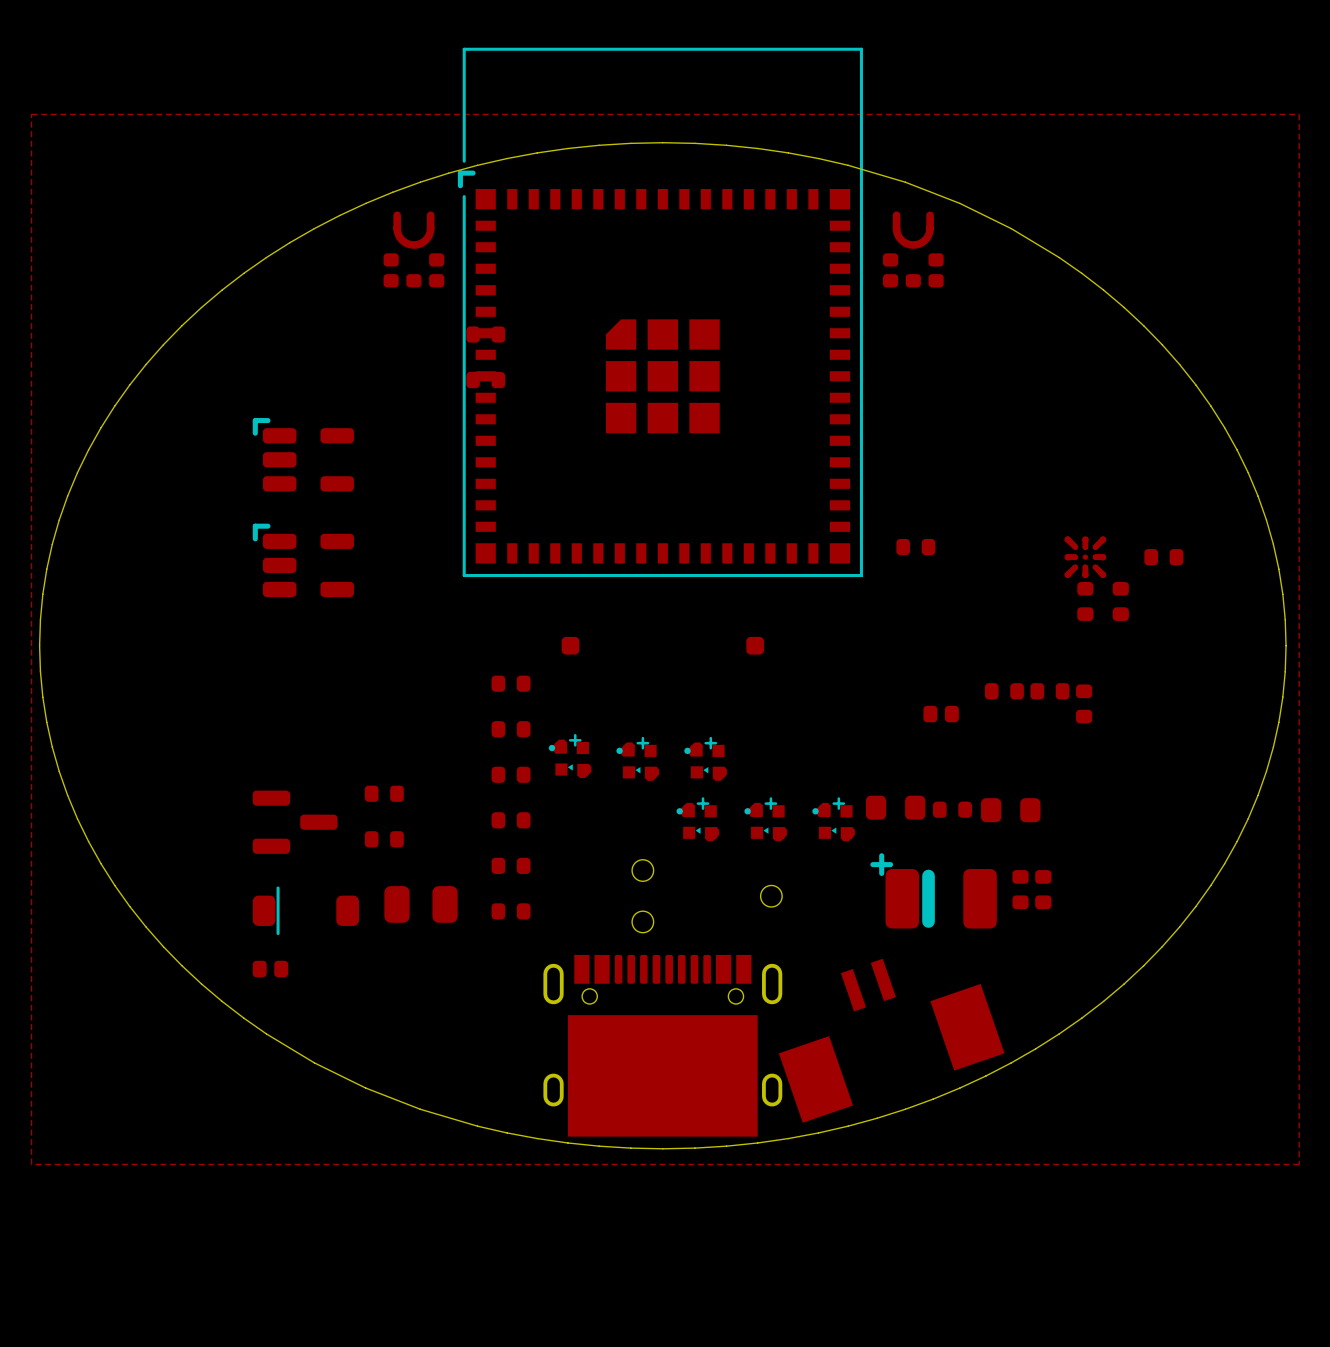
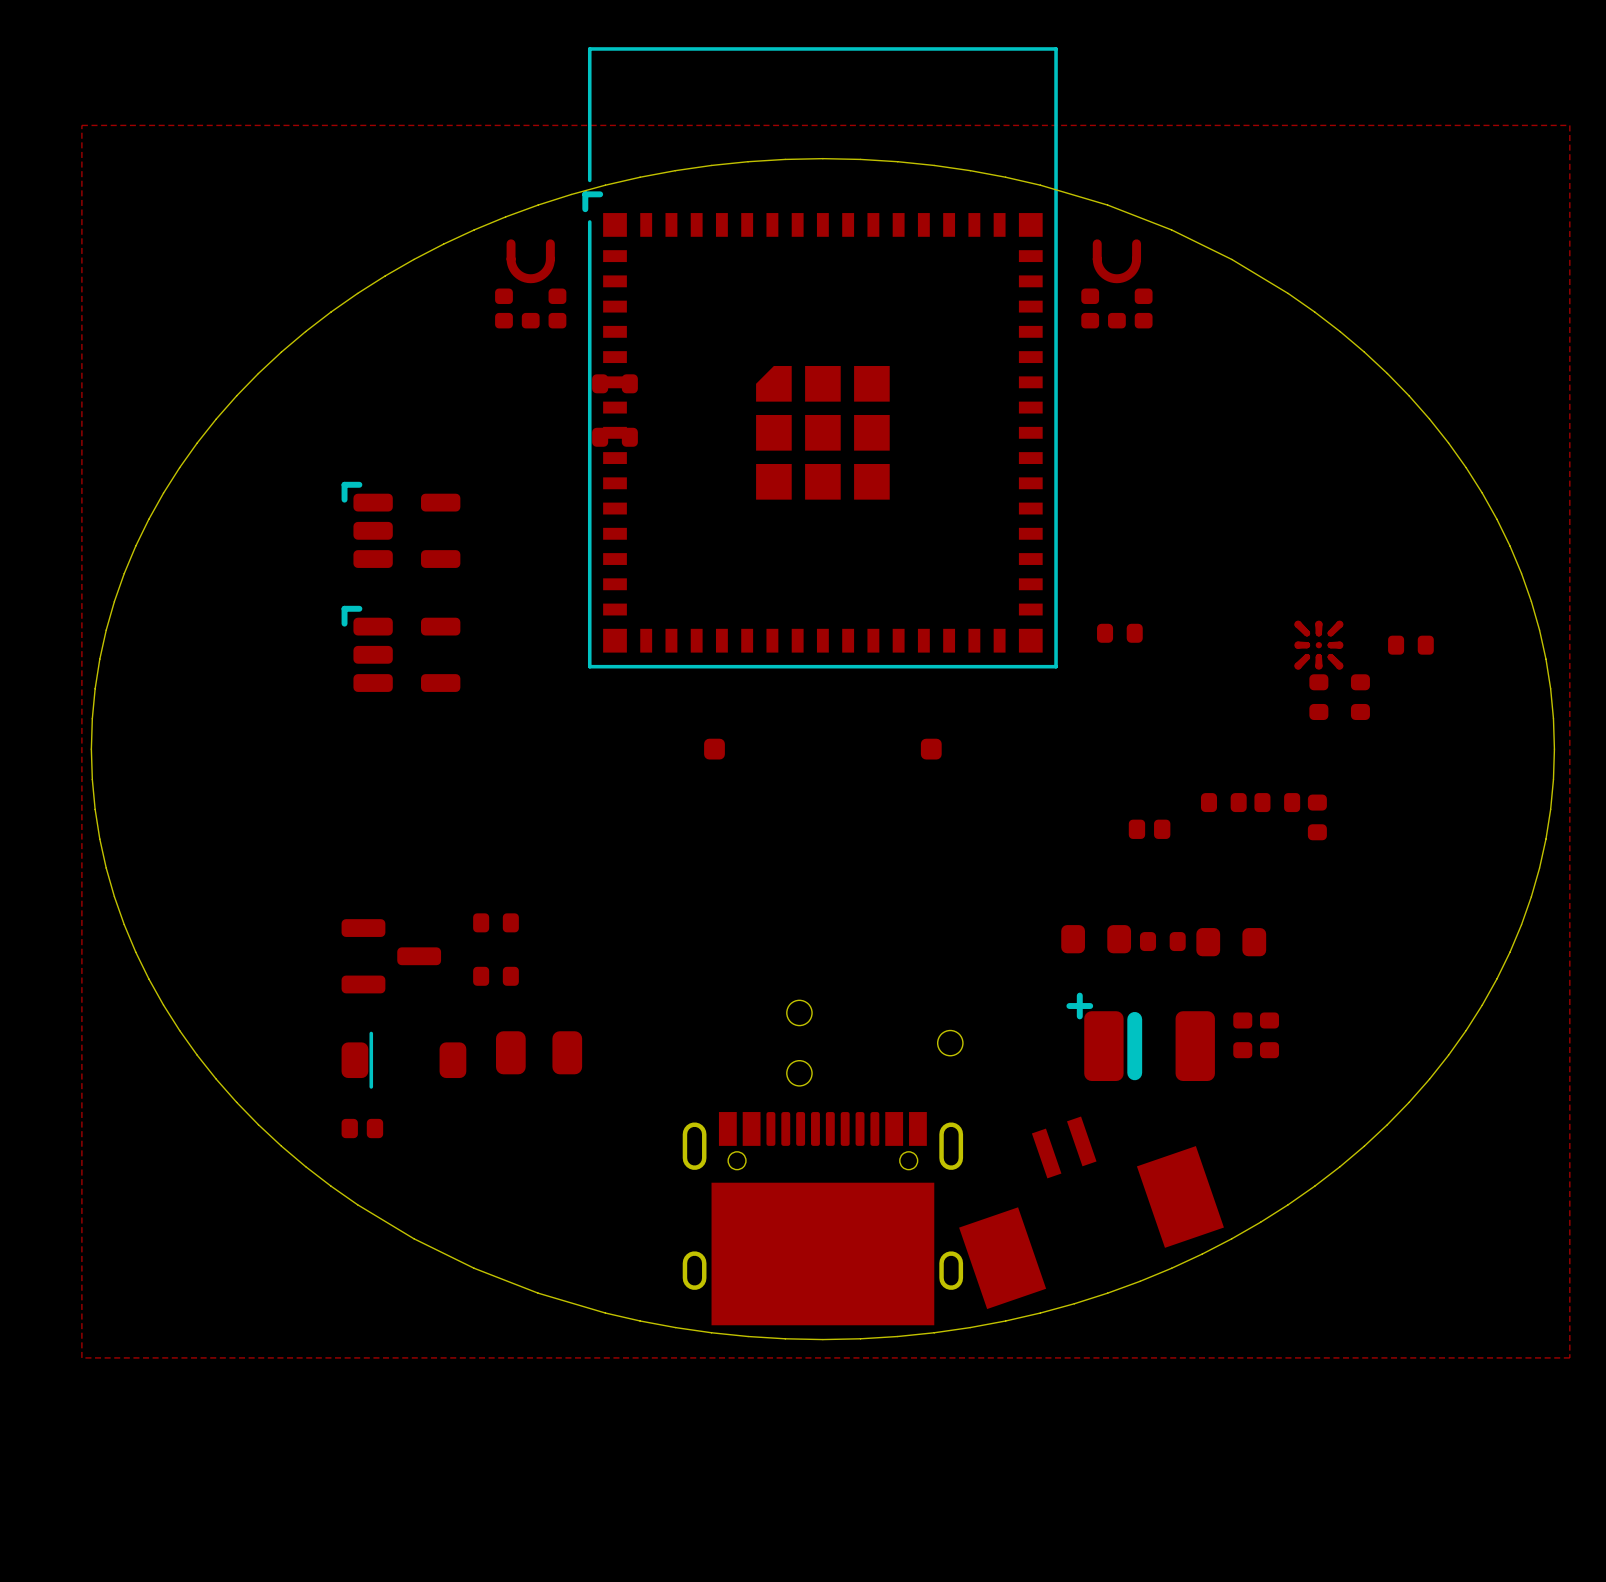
part: (511, 683) -> none
part: (511, 729) -> none
part: (570, 755) -> none
part: (637, 758) -> none
part: (705, 758) -> none
part: (511, 774) -> none
part: (697, 819) -> none
part: (765, 819) -> none
part: (833, 819) -> none
part: (511, 820) -> none
part: (511, 865) -> none
part: (511, 911) -> none

